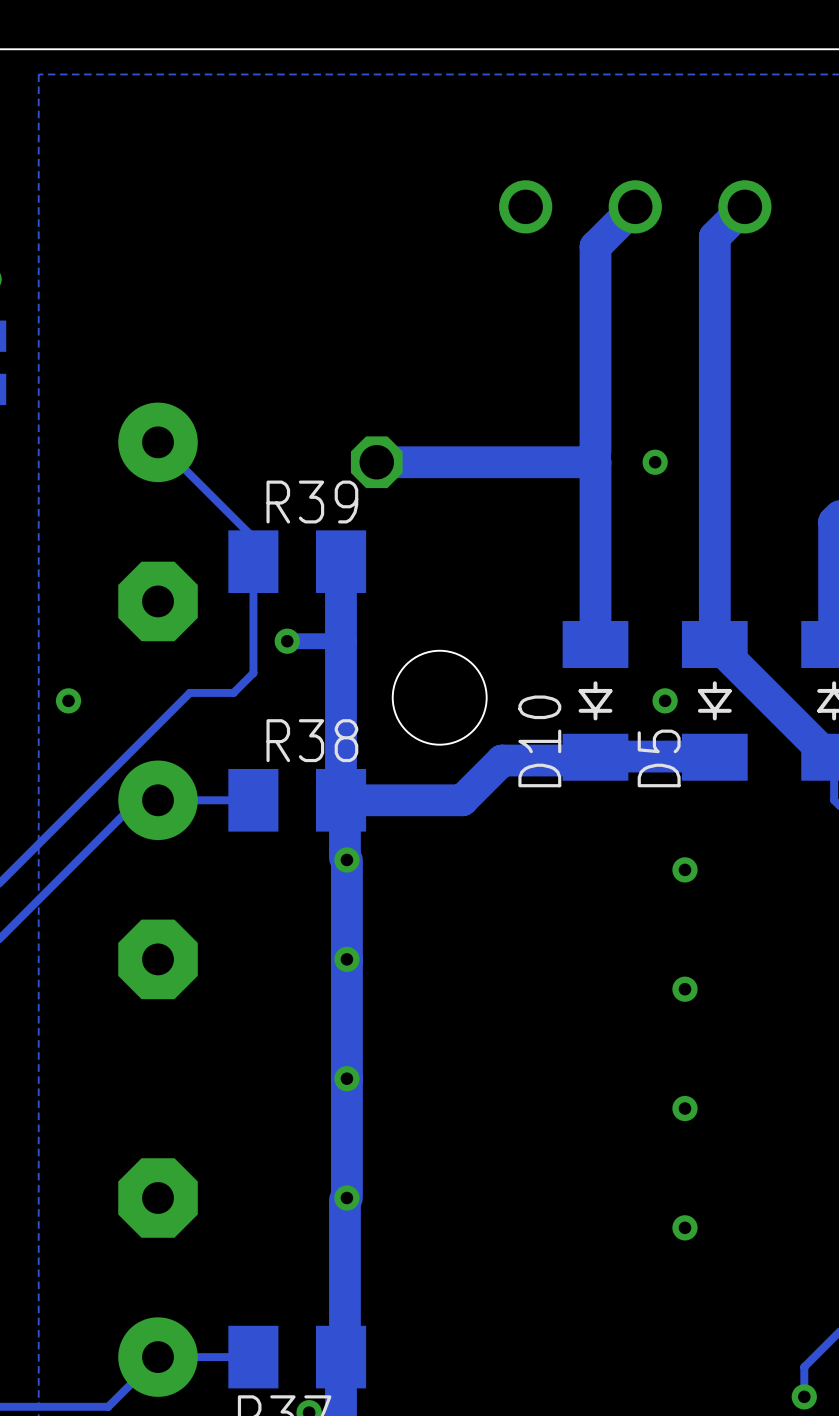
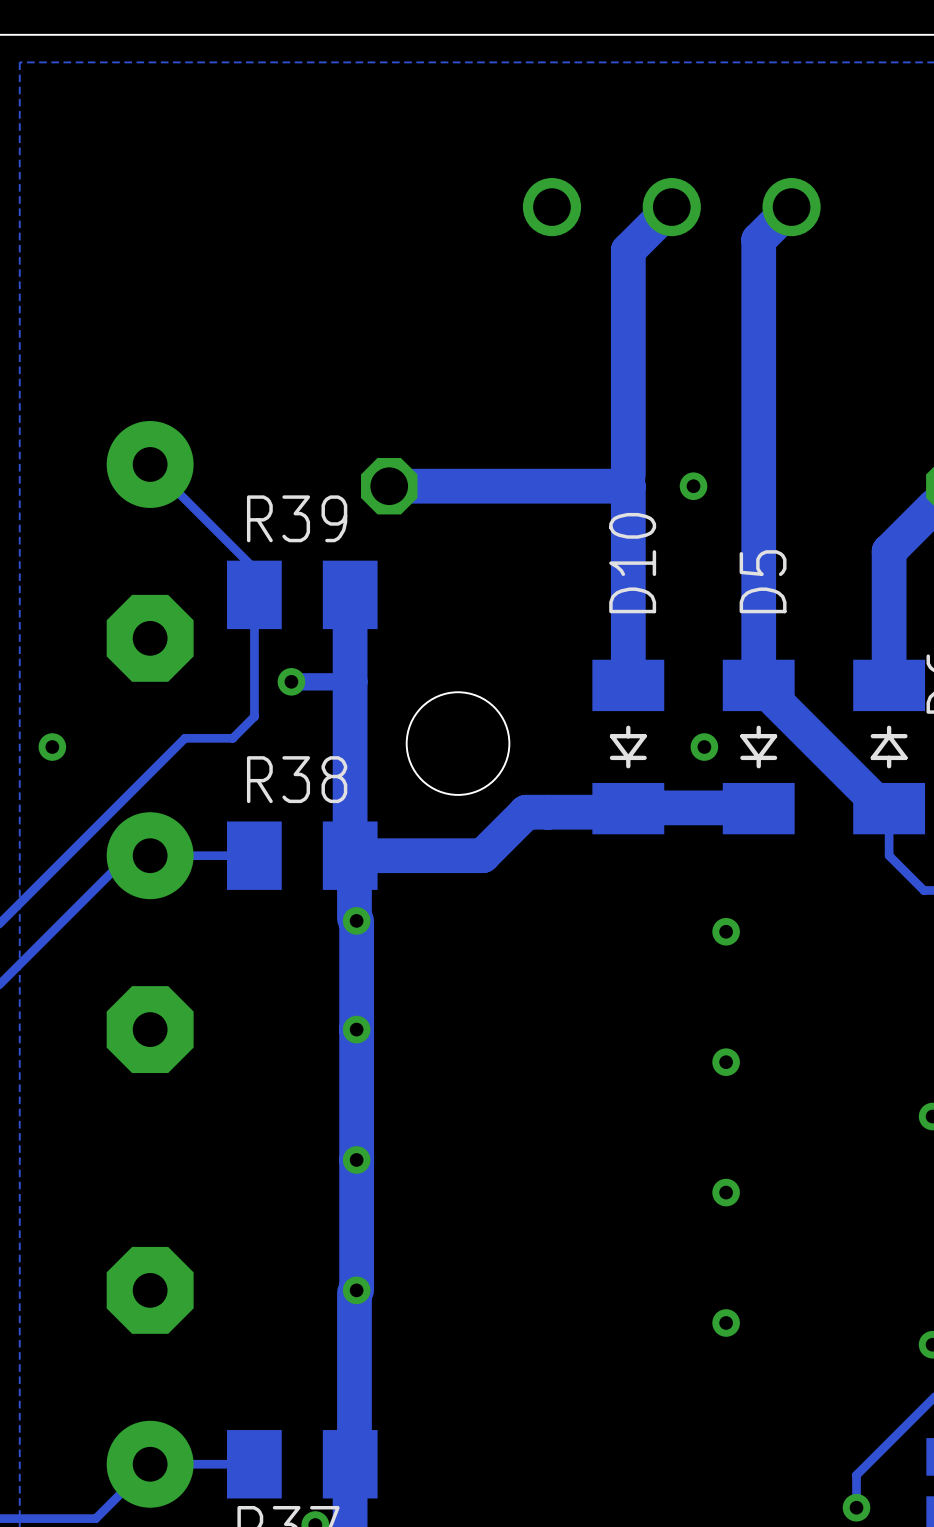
R39 name position: R39 (312, 502) -> R39 (297, 518)
R38 name position: R38 (312, 740) -> R38 (297, 779)
D10 name position: D10 (539, 741) -> D10 (632, 563)
D5 name position: D5 (659, 758) -> D5 (763, 581)

